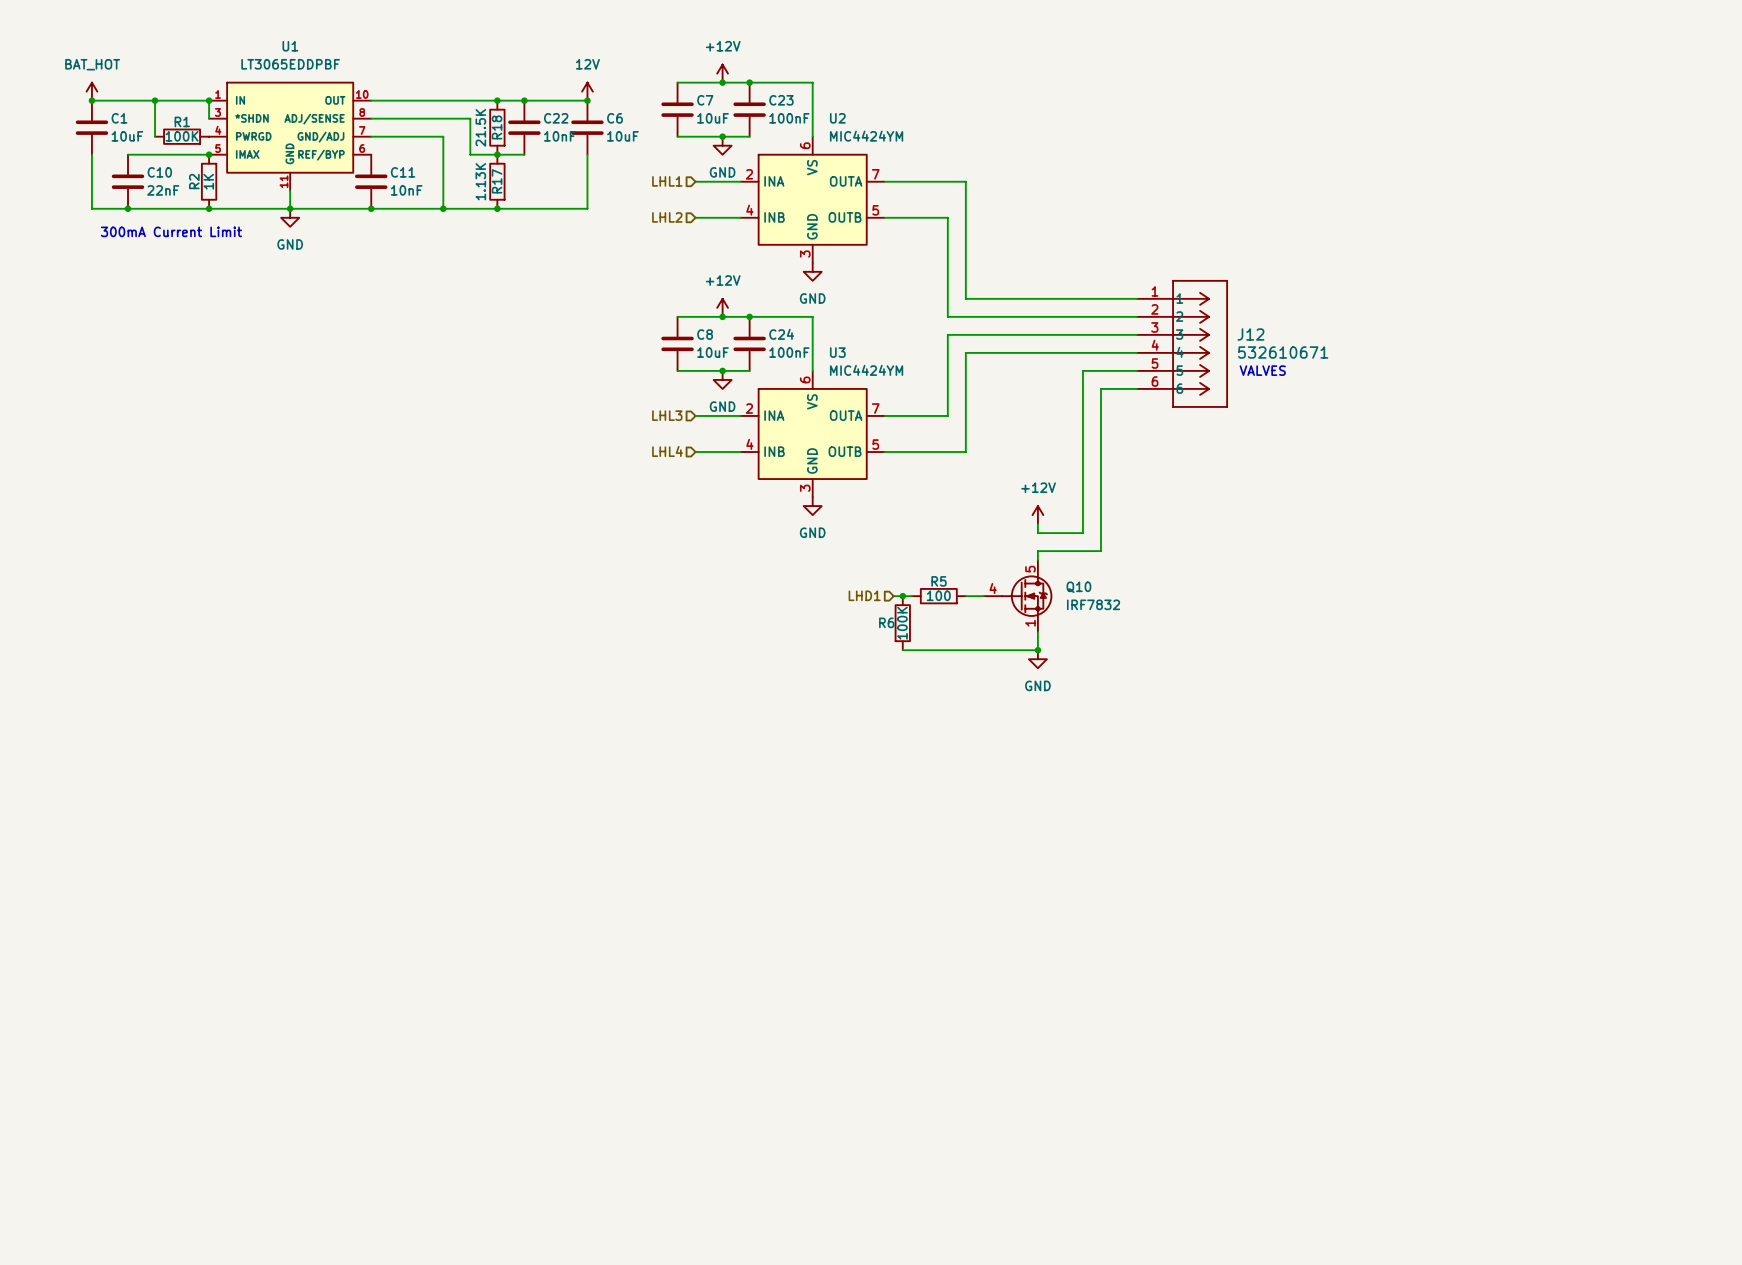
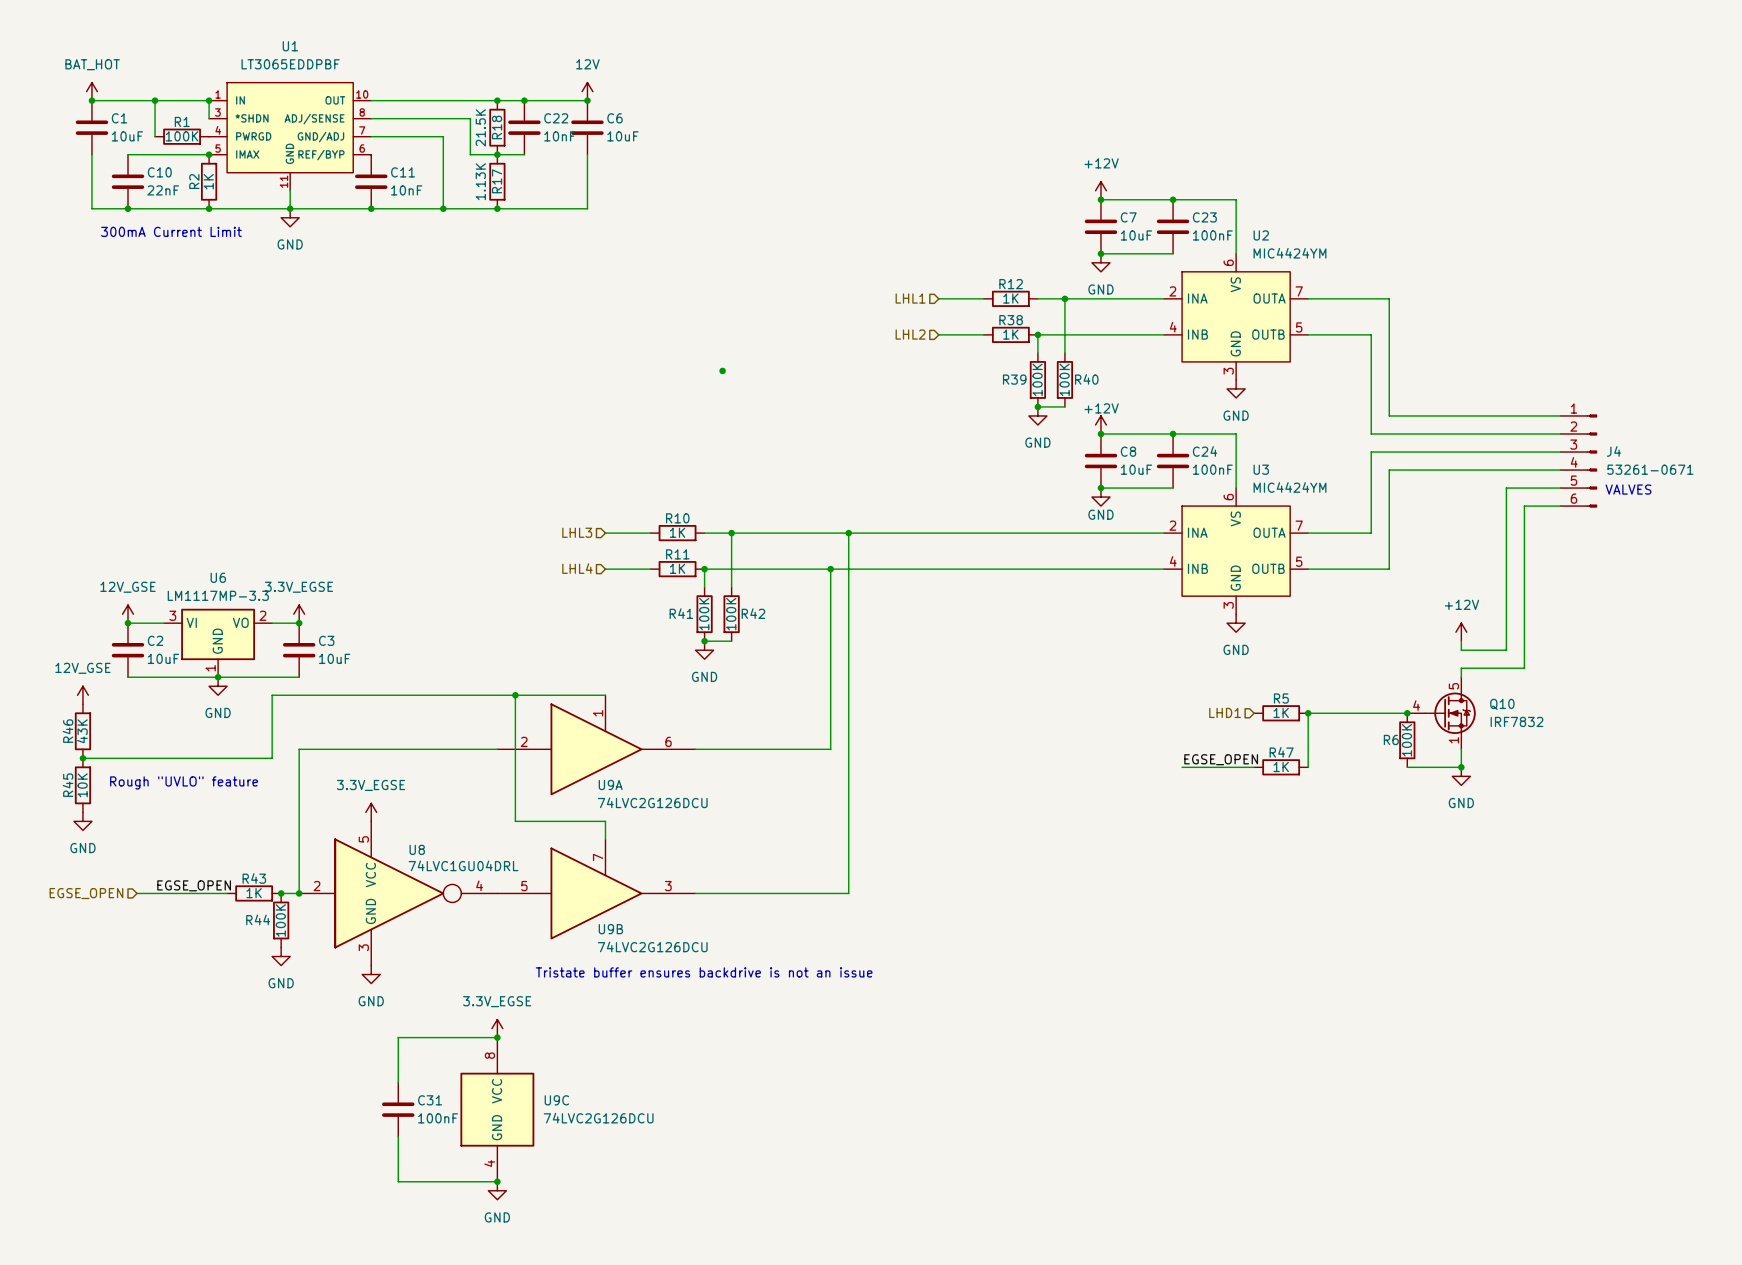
power symbol: +12V (722, 73) -> none
wire: (677, 82) (812, 82) (812, 136) -> none
junction: (722, 82) -> none
junction: (749, 82) -> none
C7 position: (677, 109) -> (1100, 226)
C23 position: (749, 109) -> (1173, 226)
wire: (677, 136) (749, 136) -> none
junction: (722, 136) -> none
power symbol: GND (722, 145) -> none
hierarchical label: LHL1 (667, 181) -> none
wire: (695, 181) (740, 181) -> none
wire: (884, 181) (965, 181) (965, 298) -> (938, 298) (965, 298)
power symbol: none -> +12V (1100, 190)
U2 position: (812, 199) -> (1236, 316)
wire: none -> (1100, 199) (1236, 199) (1236, 253)
junction: none -> (1100, 199)
junction: none -> (1173, 199)
hierarchical label: LHL2 (667, 217) -> none
wire: (695, 217) (740, 217) -> none
wire: (884, 217) (947, 217) (947, 316) (1137, 316) -> none
wire: none -> (1100, 253) (1173, 253)
junction: none -> (1100, 253)
power symbol: none -> GND (1100, 262)
power symbol: GND (812, 271) -> none
hierarchical label: none -> LHL1 (910, 298)
wire: (983, 298) (1037, 298) -> none
R12: none -> 1K (1010, 298)
wire: none -> (1064, 298) (1064, 352)
junction: none -> (1064, 298)
wire: none -> (1308, 298) (1389, 298) (1389, 415) (1560, 415)
power symbol: +12V (722, 307) -> none
wire: (677, 316) (812, 316) (812, 370) -> none
junction: (722, 316) -> none
junction: (749, 316) -> none
hierarchical label: none -> LHL2 (910, 334)
wire: (947, 334) (947, 415) (884, 415) -> (947, 334) (938, 334)
wire: (983, 334) (1037, 334) -> (1037, 352) (1037, 334)
R38: none -> 1K (1010, 334)
junction: none -> (1037, 334)
wire: none -> (1308, 334) (1371, 334) (1371, 433) (1560, 433)
C8 position: (677, 343) -> (1100, 461)
C24 position: (749, 343) -> (1173, 461)
J12: 532610671 (1182, 343) -> none
wire: (1137, 352) (965, 352) (965, 452) (884, 452) -> none
wire: (677, 370) (749, 370) -> none
wire: (1137, 370) (1082, 370) (1082, 533) -> (1164, 533) (1082, 533)
text: VALVES (1262, 370) -> none
power symbol: GND (722, 379) -> none
R39: none -> 100K (1037, 379)
R40: none -> 100K (1064, 379)
wire: (1137, 388) (1100, 388) (1100, 551) (1037, 551) (1037, 560) -> none
power symbol: none -> GND (1236, 388)
wire: none -> (1037, 406) (1064, 406)
junction: none -> (1037, 406)
hierarchical label position: LHL3 (667, 415) -> LHL3 (577, 532)
wire: (695, 415) (740, 415) -> (605, 533) (650, 533)
power symbol: none -> GND (1037, 415)
U3 position: (812, 433) -> (1236, 551)
wire: none -> (1100, 433) (1236, 433) (1236, 488)
junction: none -> (1100, 433)
junction: none -> (1173, 433)
hierarchical label position: LHL4 (667, 451) -> LHL4 (577, 568)
wire: (695, 452) (740, 452) -> (605, 569) (650, 569)
wire: none -> (1560, 452) (1371, 452) (1371, 533) (1308, 533)
J4: none -> 53261-0671 (1578, 461)
wire: none -> (1560, 470) (1389, 470) (1389, 569) (1308, 569)
power symbol text position: +12V (1038, 487) -> +12V (1101, 408)
wire: none -> (1100, 488) (1173, 488)
junction: none -> (1100, 488)
wire: none -> (1560, 488) (1506, 488) (1506, 650) (1461, 650) (1461, 641)
text: none -> VALVES (1628, 489)
power symbol: none -> GND (1100, 497)
power symbol: GND (812, 506) -> none
wire: none -> (1560, 506) (1524, 506) (1524, 668) (1461, 668) (1461, 677)
power symbol position: +12V (1037, 515) -> +12V (1100, 424)
wire: (1037, 524) (1037, 533) -> (704, 533) (1037, 533)
R10: none -> 1K (677, 533)
wire: none -> (731, 533) (731, 587)
junction: none -> (731, 533)
wire: none -> (848, 533) (848, 893) (695, 893)
junction: none -> (848, 533)
R11: none -> 1K (677, 569)
junction: none -> (704, 569)
wire: none -> (830, 569) (830, 749) (695, 749)
junction: none -> (830, 569)
wire: none -> (1164, 569) (704, 569) (704, 587)
hierarchical label: LHD1 (864, 595) -> none
R5 value: 100 (938, 595) -> 1K (1281, 712)
wire: (893, 596) (911, 596) -> none
junction: (902, 596) -> none
R5 position: (938, 596) -> (1281, 713)
wire: (965, 596) (983, 596) -> none
Q10 position: (1018, 596) -> (1441, 713)
power symbol: none -> 12V_GSE (128, 614)
power symbol: none -> 3.3V_EGSE (299, 614)
R41: none -> 100K (704, 614)
R42: none -> 100K (731, 614)
wire: none -> (128, 623) (164, 623)
junction: none -> (128, 623)
wire: none -> (272, 623) (299, 623)
junction: none -> (299, 623)
R6 position: (902, 623) -> (1407, 740)
power symbol: none -> GND (1236, 623)
wire: (1037, 632) (1037, 650) (902, 650) -> none
power symbol: none -> +12V (1461, 632)
wire: none -> (704, 641) (731, 641)
junction: none -> (704, 641)
U6: none -> LM1117MP-3.3 (218, 643)
C2: none -> 10uF (128, 650)
C3: none -> 10uF (299, 650)
power symbol: none -> GND (704, 650)
junction: (1037, 650) -> none
power symbol: GND (1037, 659) -> none
wire: none -> (128, 677) (299, 677)
junction: none -> (218, 677)
power symbol: none -> GND (218, 686)
power symbol: none -> 12V_GSE (82, 695)
wire: none -> (515, 695) (515, 821) (605, 821) (605, 839)
junction: none -> (515, 695)
wire: none -> (605, 695) (272, 695) (272, 758) (82, 758)
hierarchical label: none -> LHD1 (1225, 712)
junction: none -> (1308, 713)
wire: none -> (1407, 713) (1308, 713) (1308, 767)
junction: none -> (1407, 713)
R46: none -> 43K (82, 731)
U9A: none -> 74LVC2G126DCU (596, 745)
wire: none -> (497, 749) (299, 749) (299, 893) (281, 893)
wire: none -> (1461, 749) (1461, 767) (1407, 767)
junction: none -> (82, 758)
label: none -> EGSE_OPEN (1221, 759)
wire: none -> (1182, 767) (1254, 767)
R47: none -> 1K (1281, 767)
junction: none -> (1461, 767)
power symbol: none -> GND (1461, 776)
text: none -> Rough "UVLO" feature (184, 782)
R45: none -> 10K (82, 785)
power symbol: none -> 3.3V_EGSE (371, 812)
power symbol: none -> GND (82, 821)
label: none -> EGSE_OPEN (194, 885)
U9B: none -> 74LVC2G126DCU (596, 889)
hierarchical label: none -> EGSE_OPEN (86, 893)
wire: none -> (137, 893) (227, 893)
R43: none -> 1K (254, 893)
junction: none -> (281, 893)
junction: none -> (299, 893)
U8: none -> 74LVC1GU04DRL (398, 893)
R44: none -> 100K (281, 920)
power symbol: none -> GND (281, 956)
text: none -> Tristate buffer ensures backdrive is not an issue (704, 972)
power symbol: none -> GND (371, 974)
power symbol: none -> 3.3V_EGSE (497, 1028)
wire: none -> (497, 1037) (398, 1037) (398, 1082)
junction: none -> (497, 1037)
C31: none -> 100nF (398, 1109)
U9C: none -> 74LVC2G126DCU (497, 1109)
wire: none -> (398, 1136) (398, 1181) (497, 1181)
junction: none -> (497, 1181)
power symbol: none -> GND (497, 1190)

